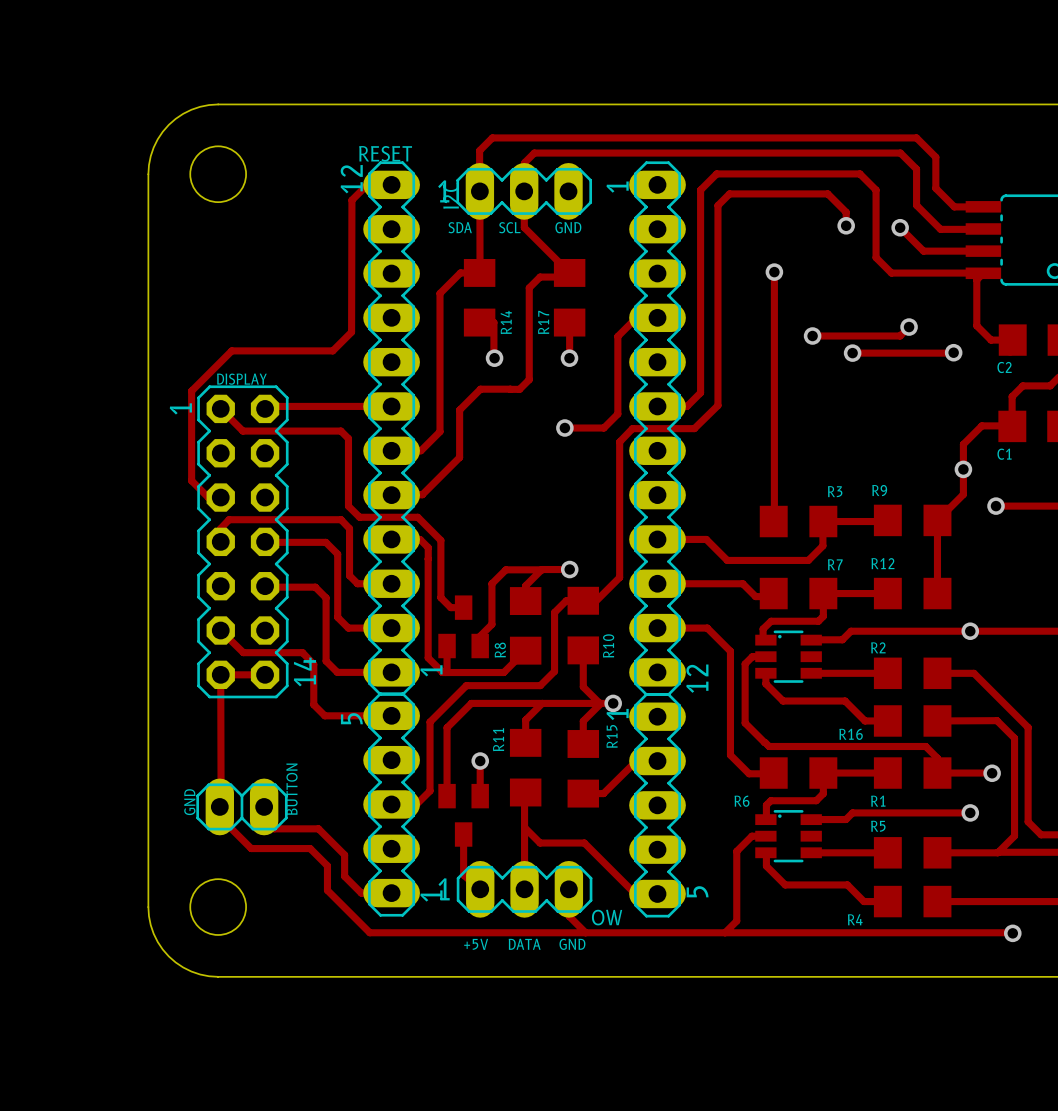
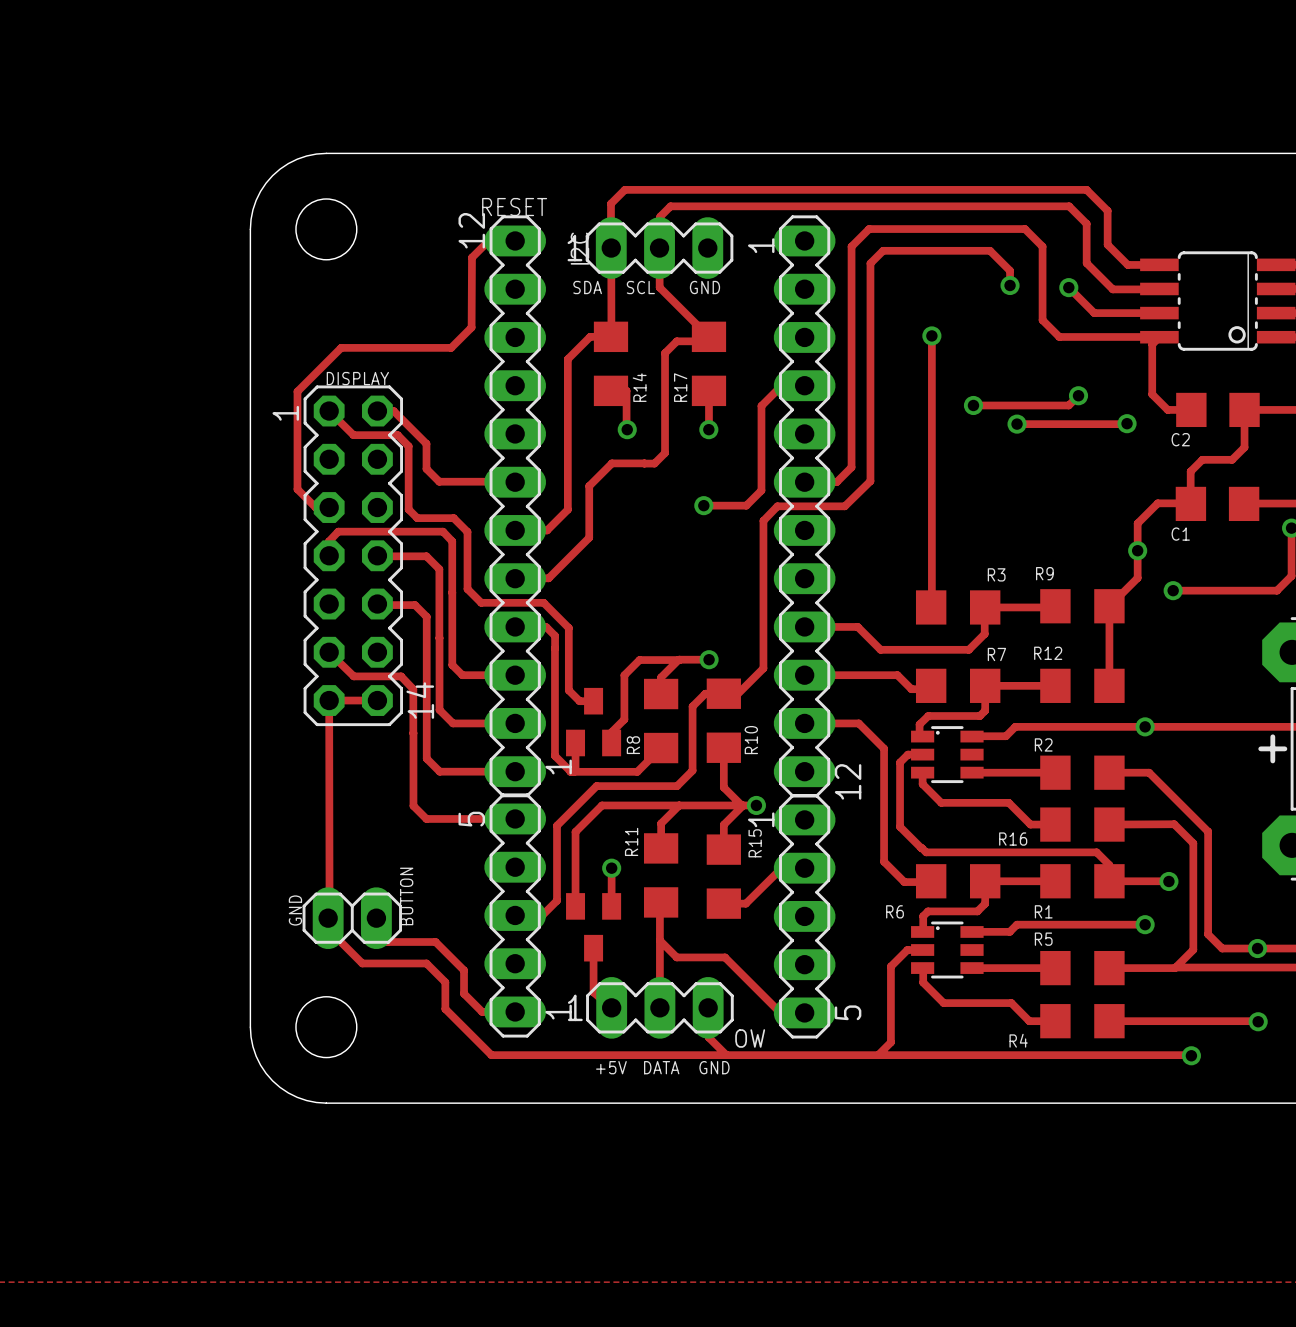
track: (351, 200) (351, 332) (332, 350) (231, 350) (191, 391) -> (471, 257) (471, 327) (451, 347) (341, 347) (297, 391) (297, 465)
track: (391, 406) (267, 406) (265, 408) -> (515, 482) (439, 481) (426, 468) (426, 443) (393, 411) (377, 411)
track: (220, 408) (242, 431) (340, 431) (348, 438) (348, 506) (360, 517) -> (329, 411) (353, 435) (397, 435) (408, 446) (408, 509) (417, 518) (453, 518) (467, 531) (467, 589) (481, 602)
track: (191, 412) (191, 480) (208, 497) (220, 497) -> (297, 489) (315, 507) (329, 507)
track: none -> (377, 555) (426, 556) (439, 569) (439, 637)
track: (220, 541) (220, 528) (229, 519) (341, 519) (349, 528) (349, 575) (357, 583) -> (329, 555) (328, 541) (338, 531) (443, 531) (452, 541) (452, 665) (462, 675) (478, 675)
DISPLAY position: (242, 541) -> (353, 555)
track: (265, 541) (325, 542) (337, 554) (337, 617) (348, 628) -> (439, 638) (439, 709) (453, 723) (468, 723)
track: none -> (329, 652) (353, 676) (401, 676) (413, 689) (413, 733)
track: (265, 586) (315, 587) (326, 597) (326, 661) (337, 672) -> (377, 604) (415, 605) (426, 616) (426, 758) (439, 771) (456, 771)
track: (220, 630) (243, 652) (302, 652) (313, 664) (313, 704) (324, 715) -> (413, 733) (413, 805) (426, 818) (442, 818)
track: (265, 674) (220, 674) (221, 805) -> (377, 700) (329, 700) (329, 916)

